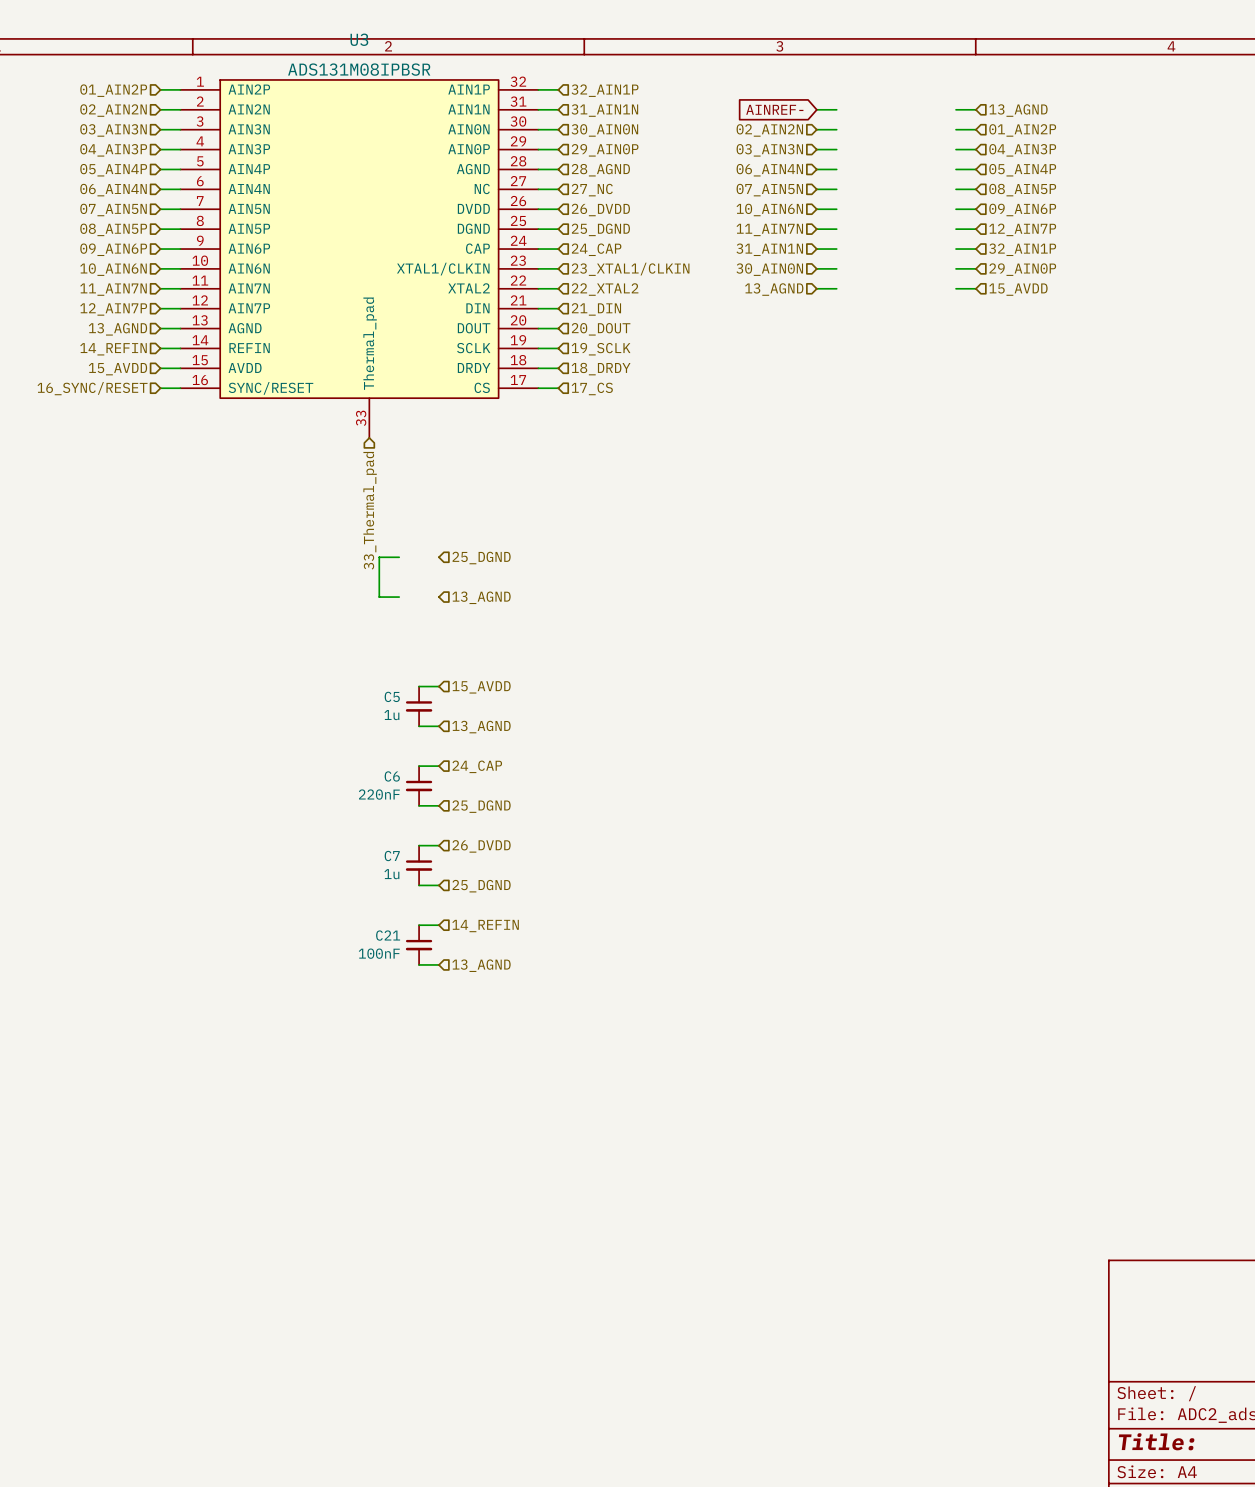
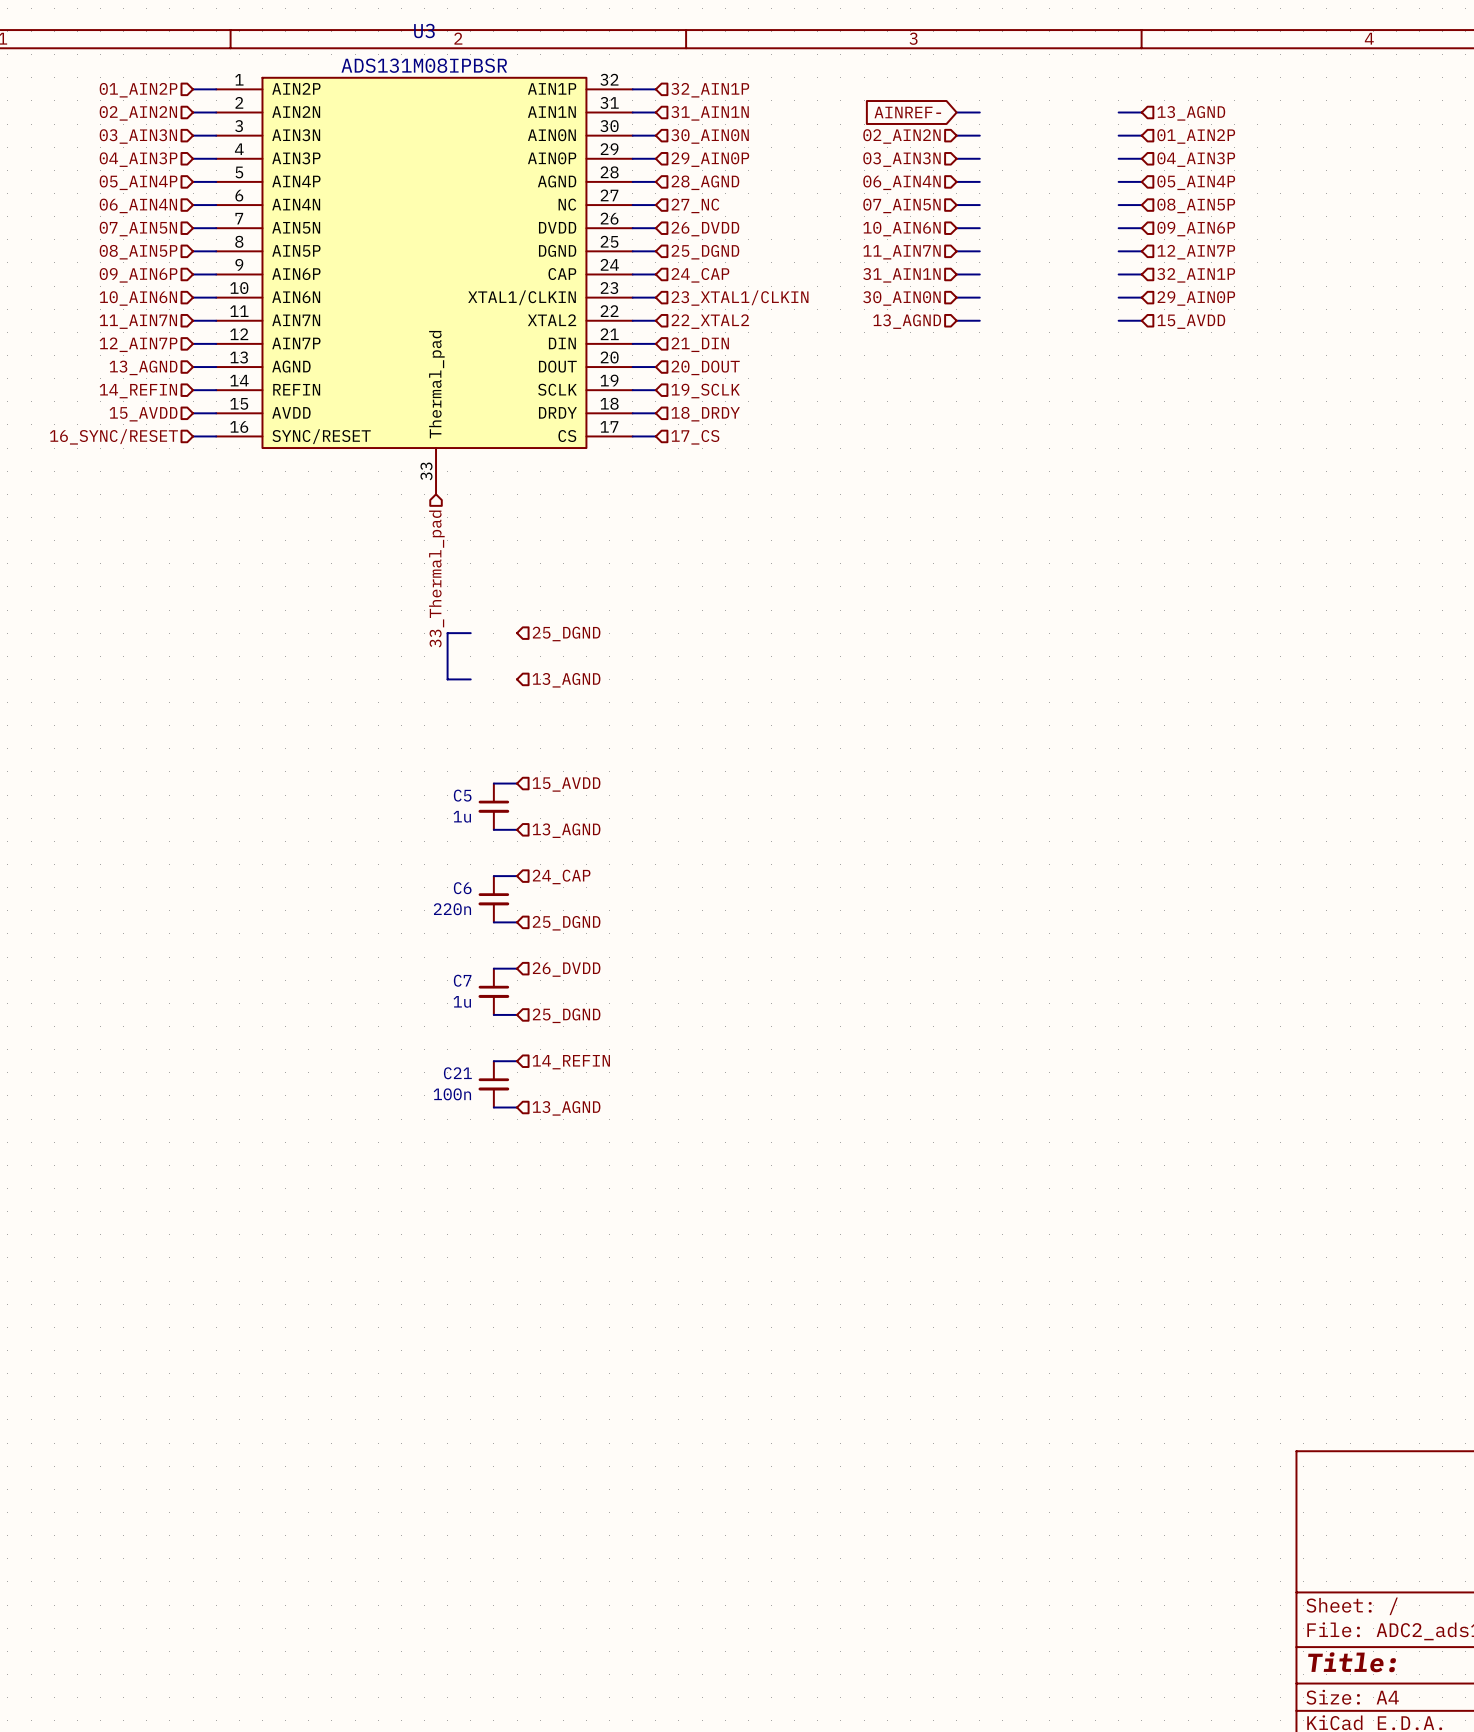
C6 value: 220nF (379, 794) -> 220n (452, 909)
C21 value: 100nF (379, 953) -> 100n (452, 1094)

